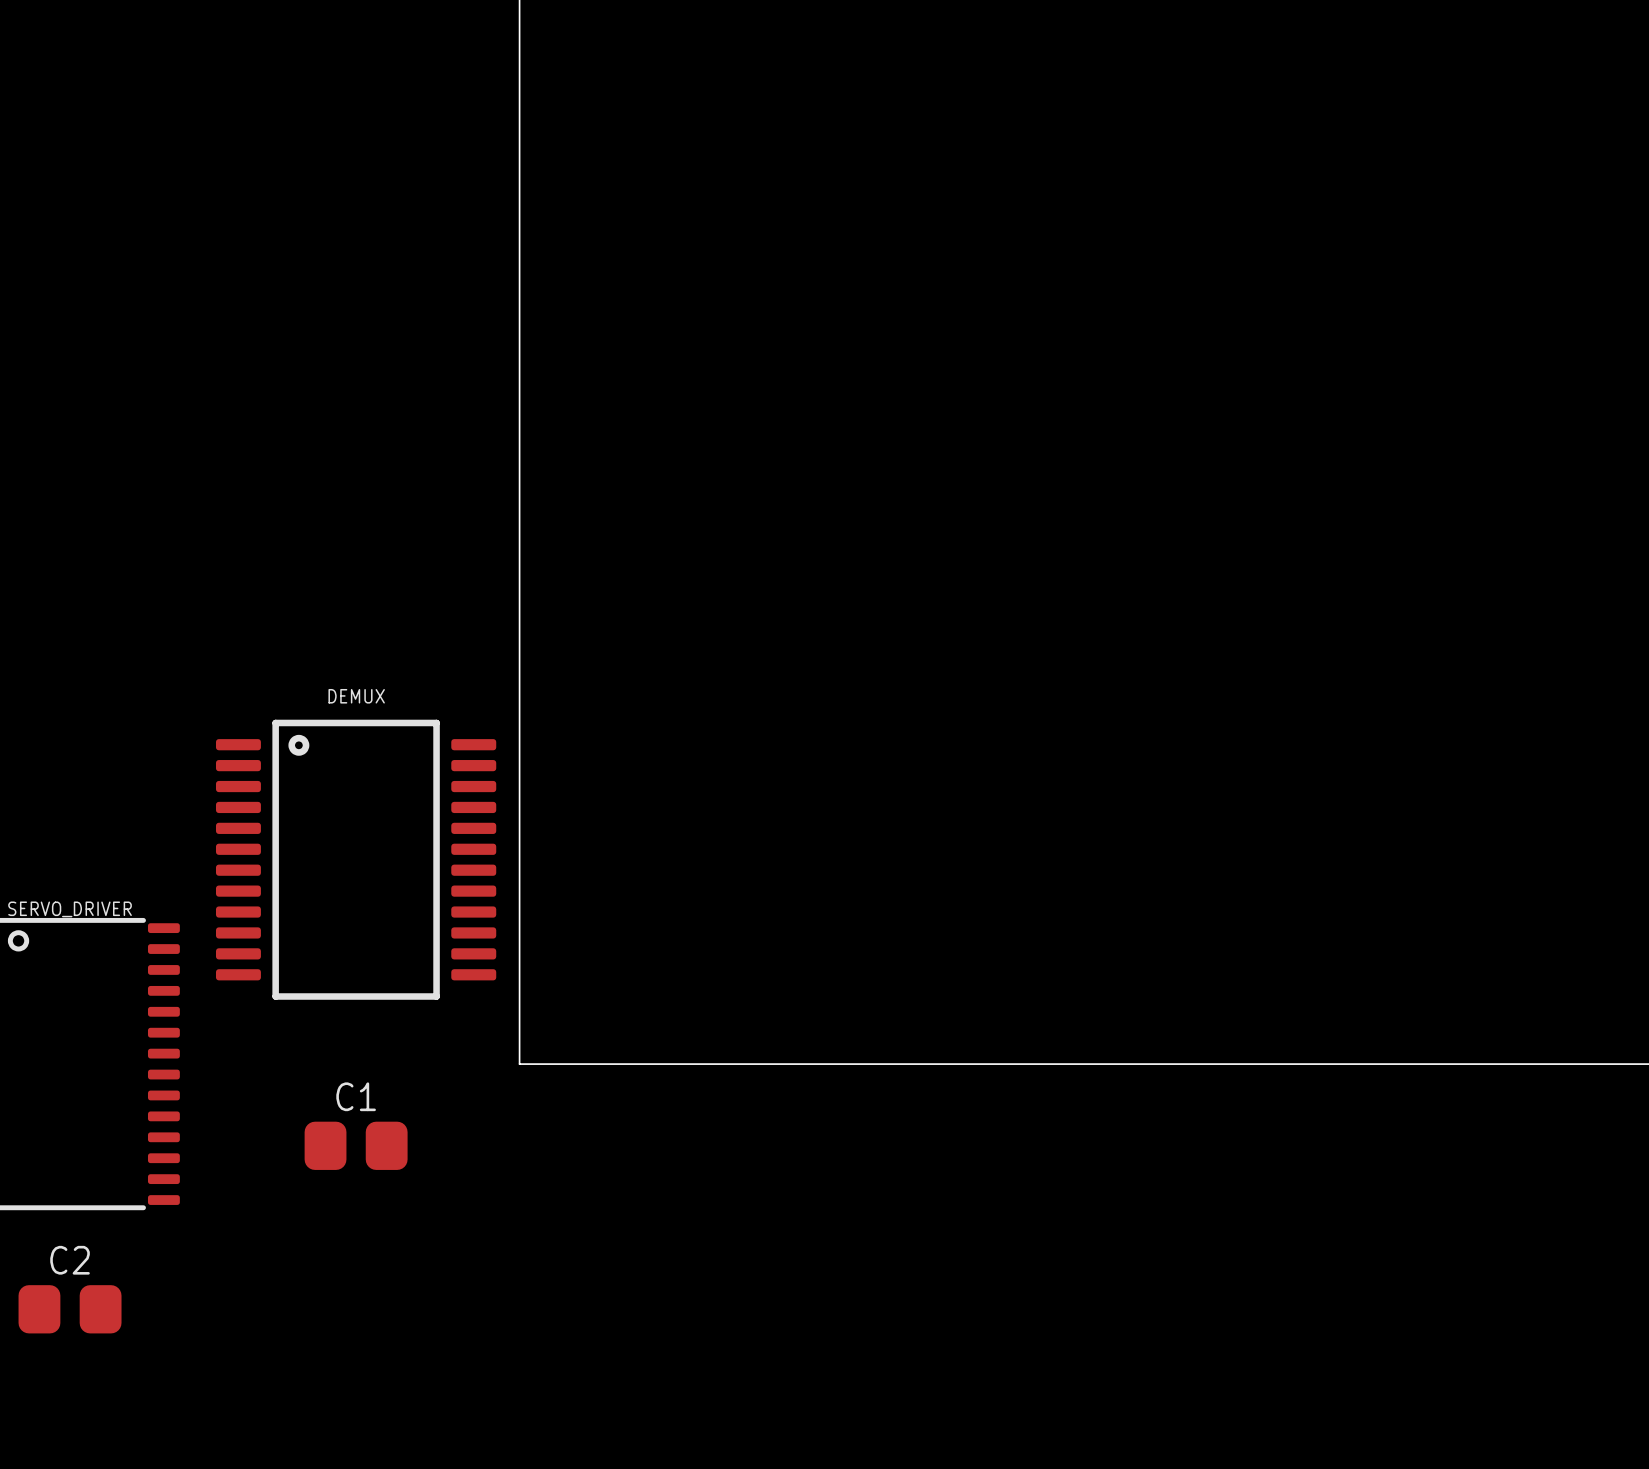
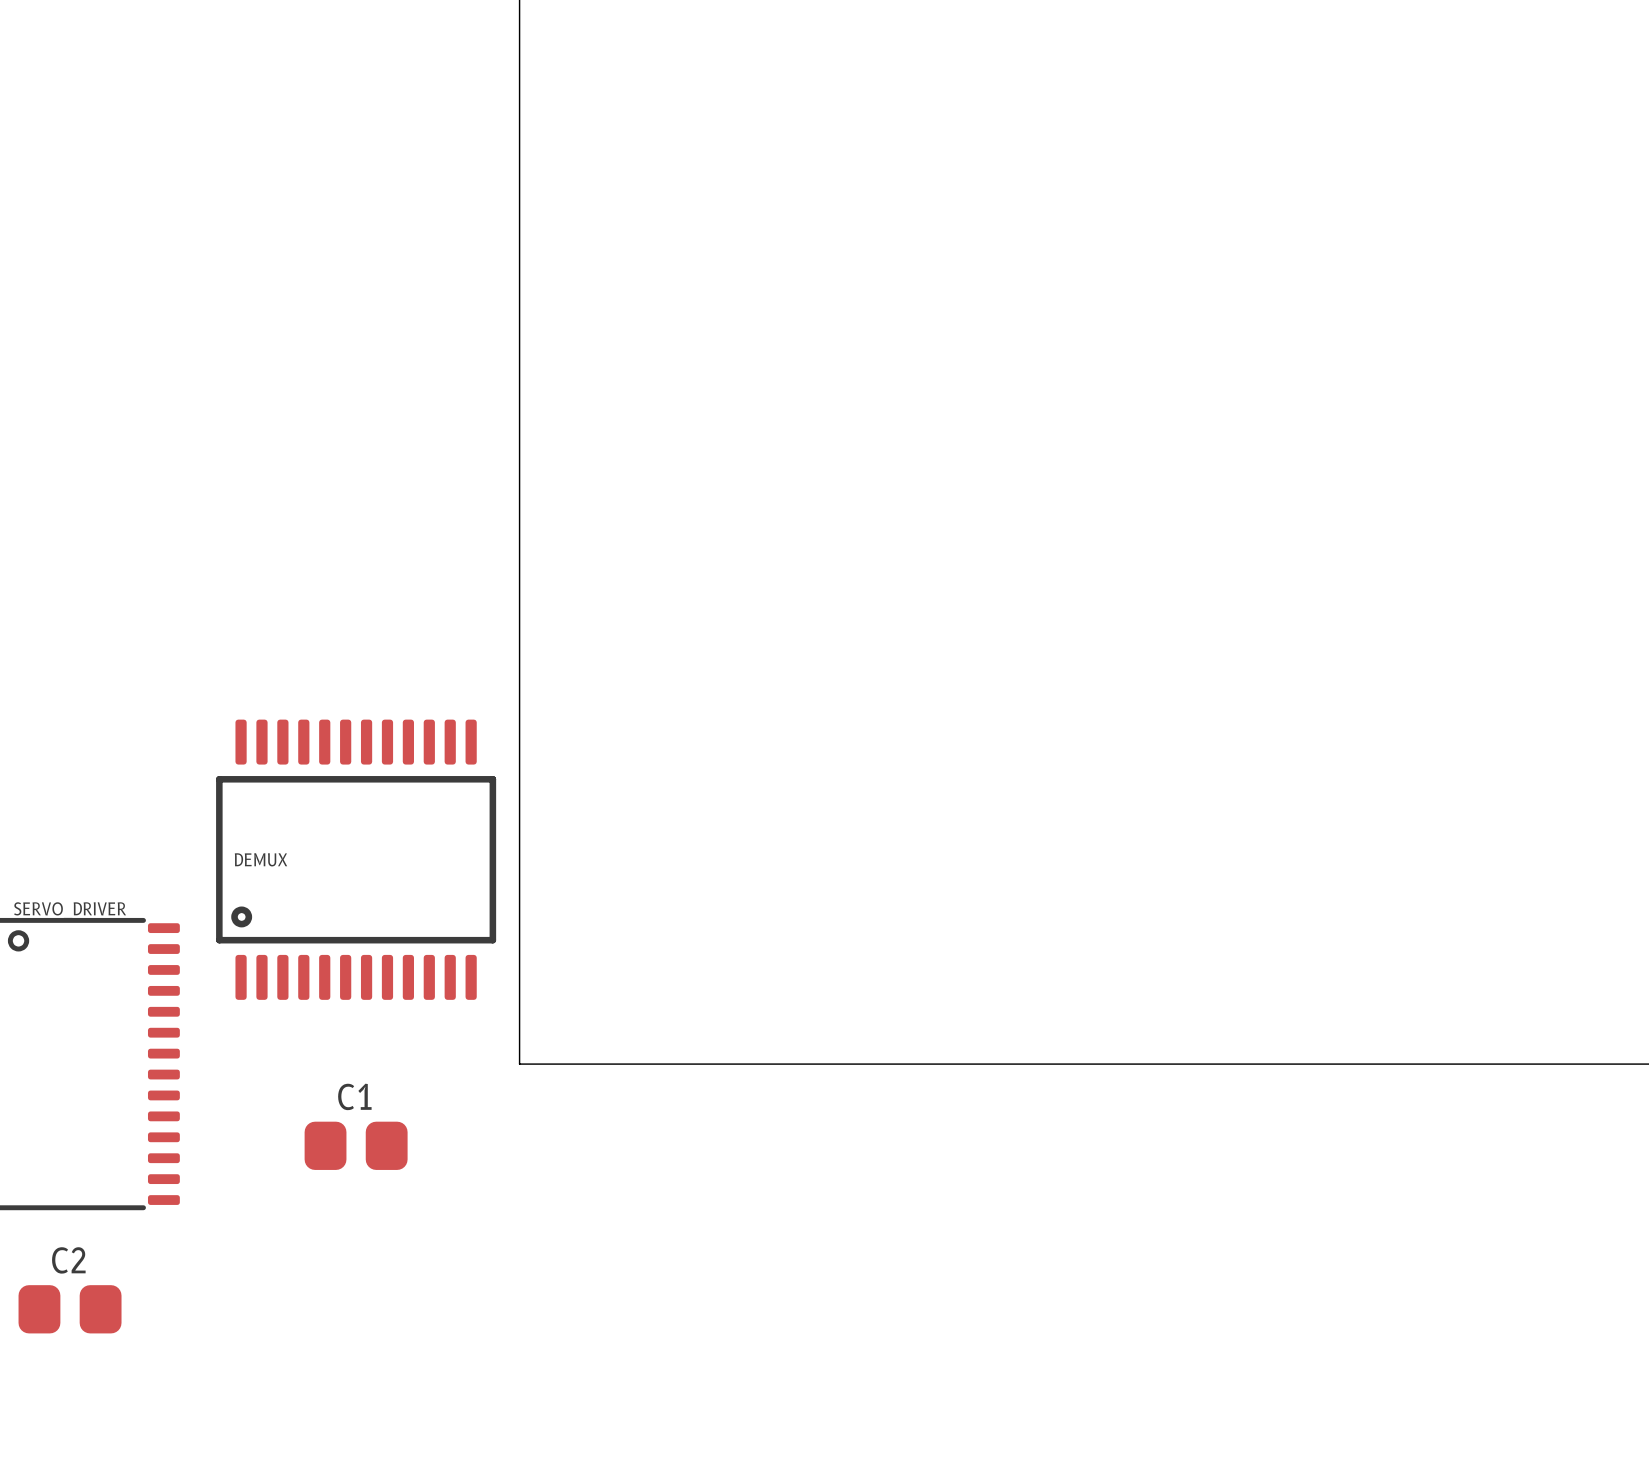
DEMUX name position: DEMUX (356, 696) -> DEMUX (261, 859)
DEMUX rotation: 0° (356, 859) -> 90° counterclockwise (356, 859)

